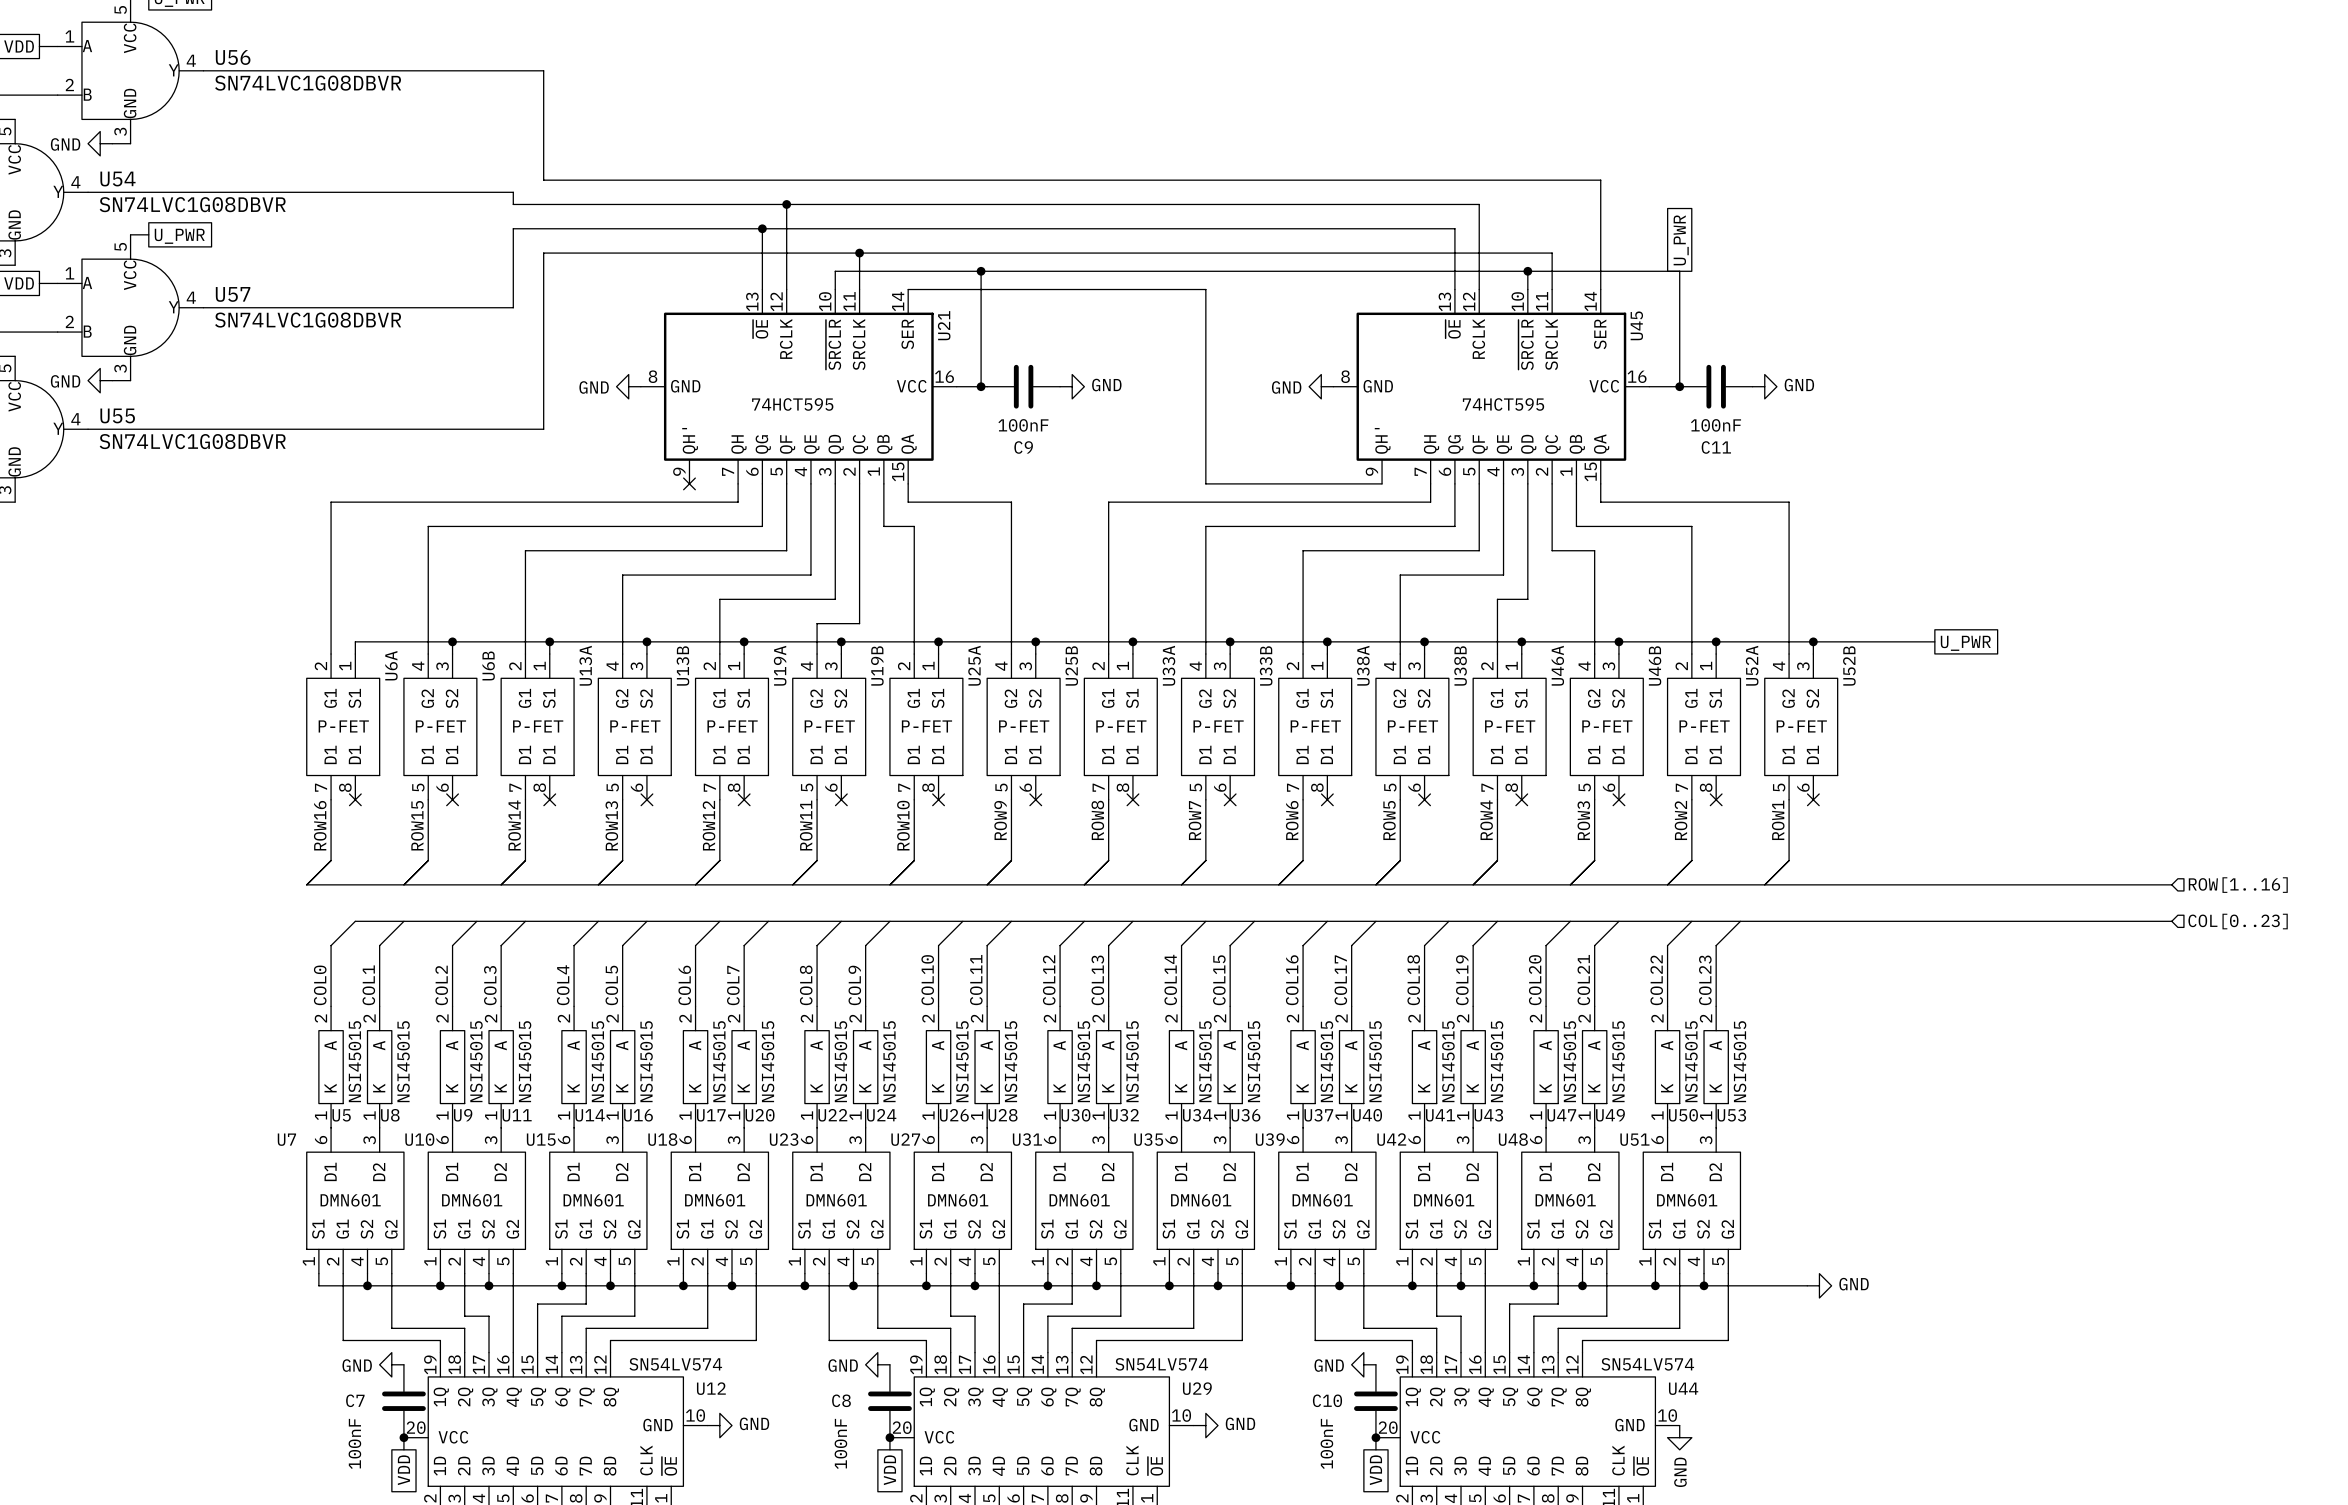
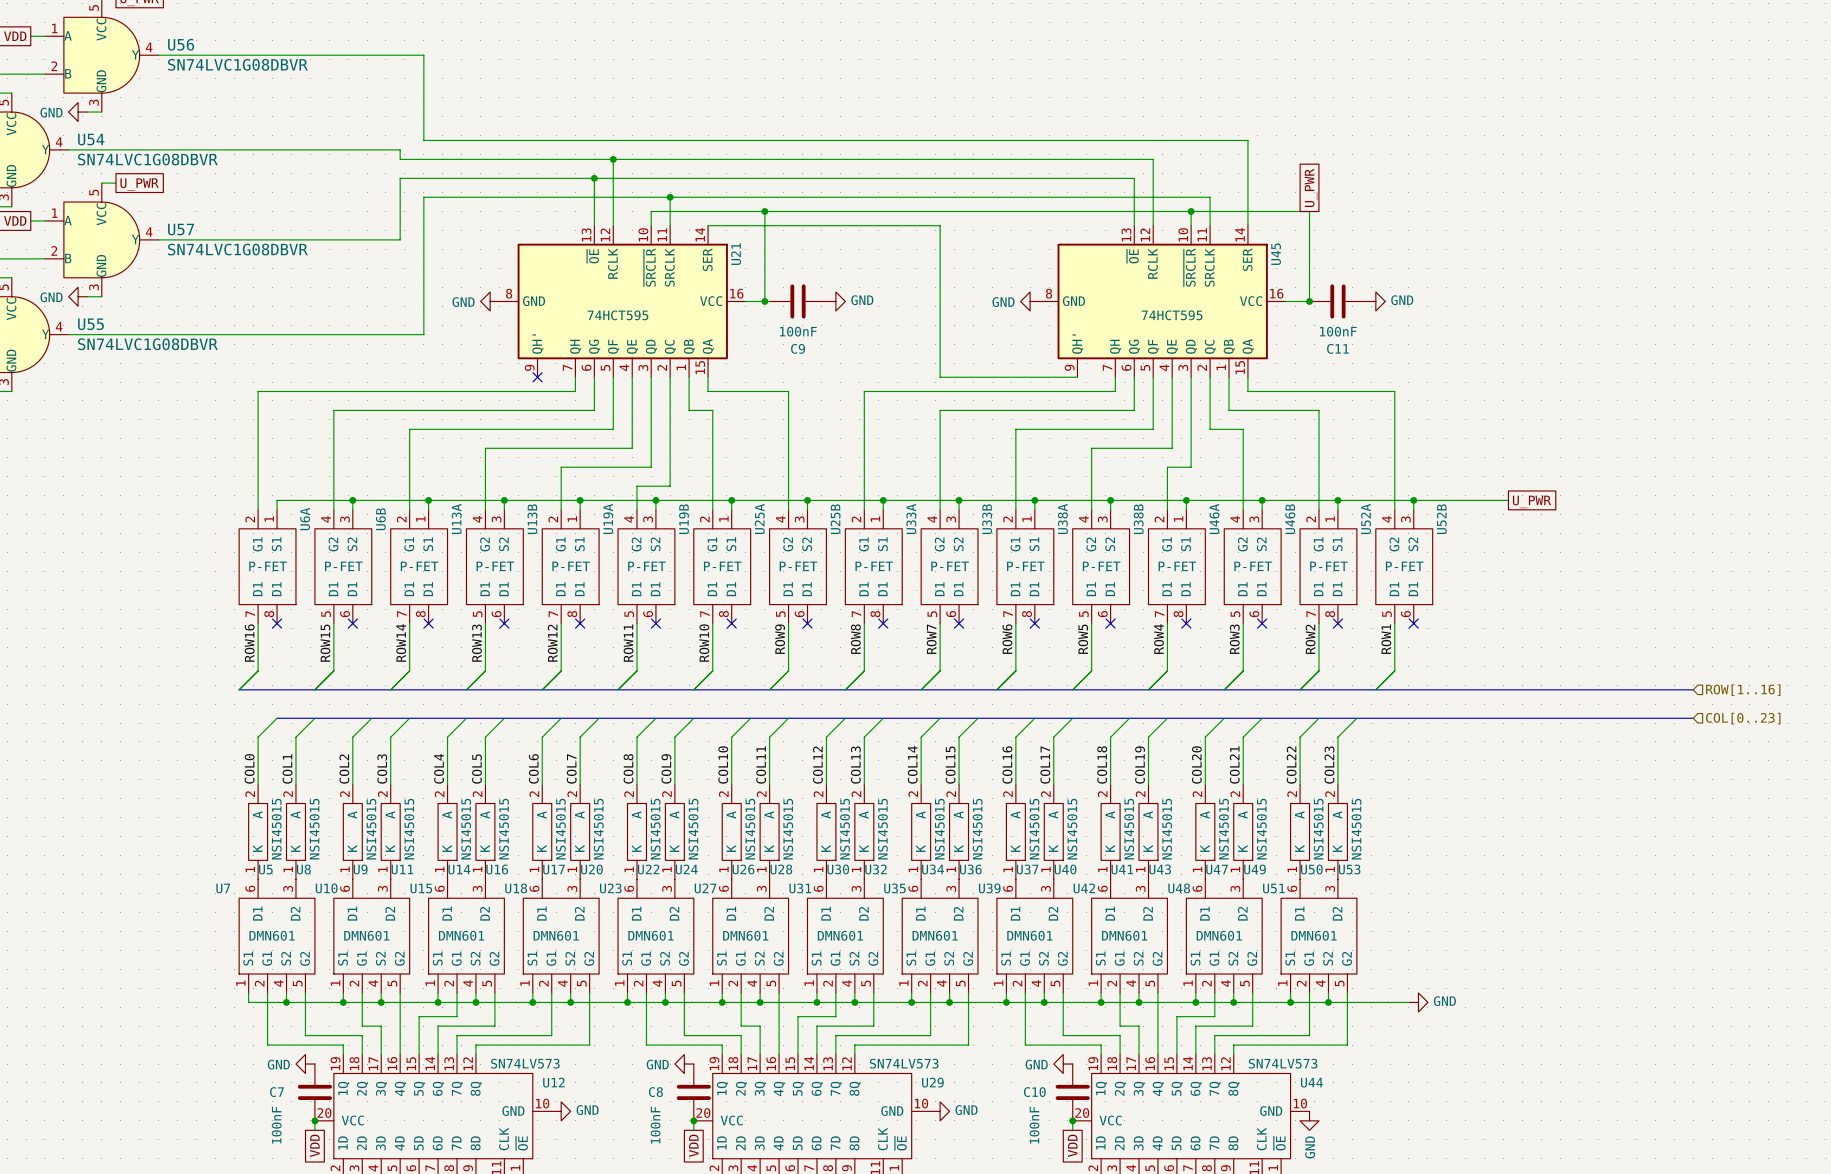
U12 value: SN54LV574 (675, 1364) -> SN74LV573 (525, 1063)
U29 value: SN54LV574 (1161, 1364) -> SN74LV573 (904, 1063)
U44 value: SN54LV574 (1647, 1364) -> SN74LV573 (1283, 1063)

